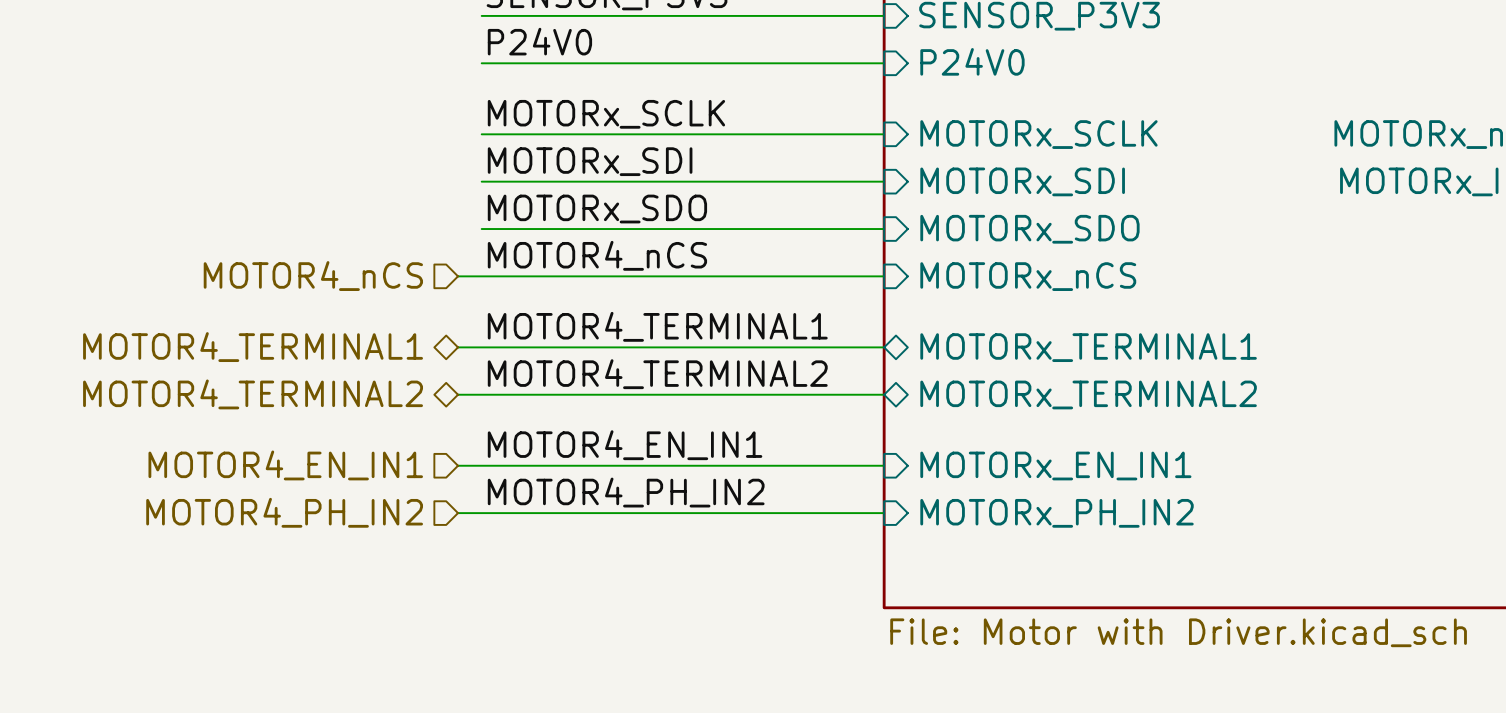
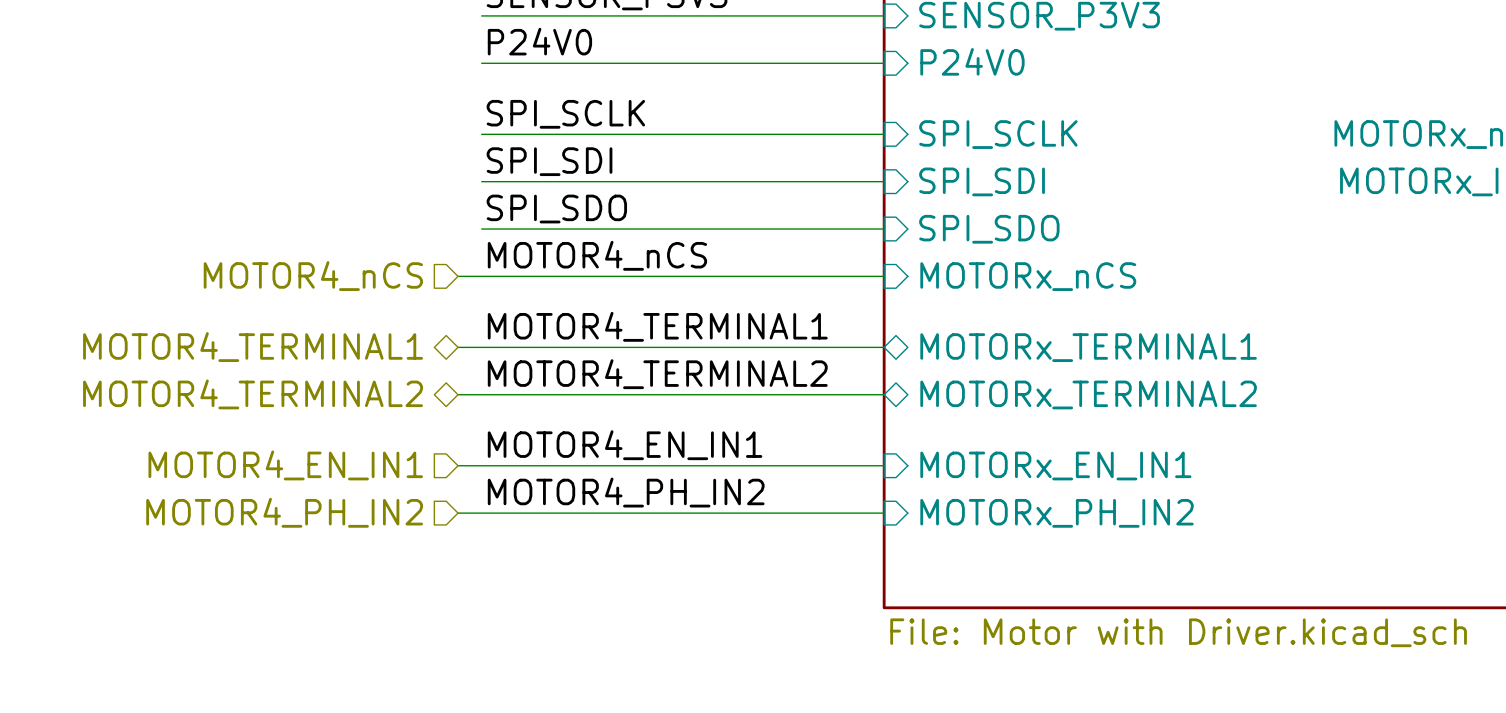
label: MOTORx_SCLK (606, 114) -> SPI_SCLK (565, 114)
sheet pin: MOTORx_SCLK (1038, 134) -> SPI_SCLK (998, 134)
label: MOTORx_SDI (590, 161) -> SPI_SDI (549, 161)
sheet pin: MOTORx_SDI (1022, 181) -> SPI_SDI (982, 181)
label: MOTORx_SDO (597, 209) -> SPI_SDO (556, 209)
sheet pin: MOTORx_SDO (1029, 229) -> SPI_SDO (989, 229)

